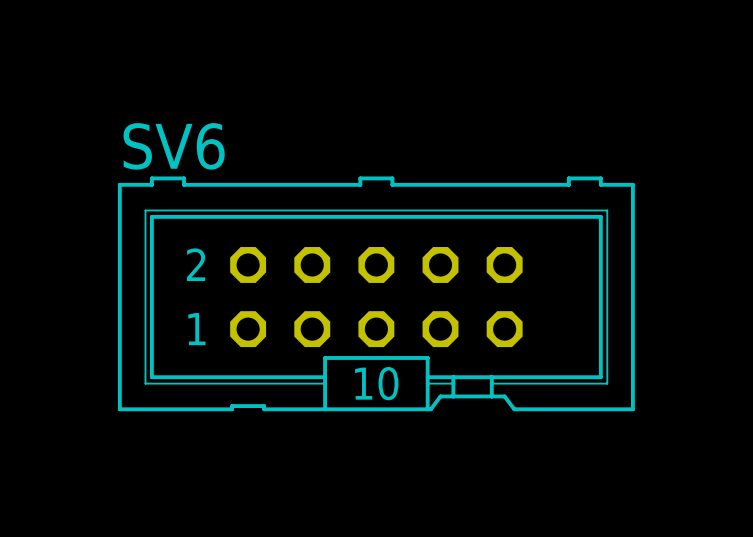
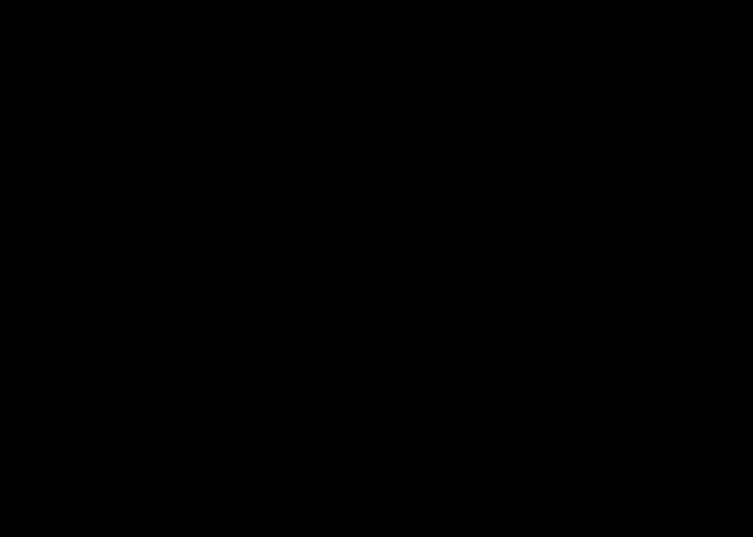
SV6: (376, 293) -> none

